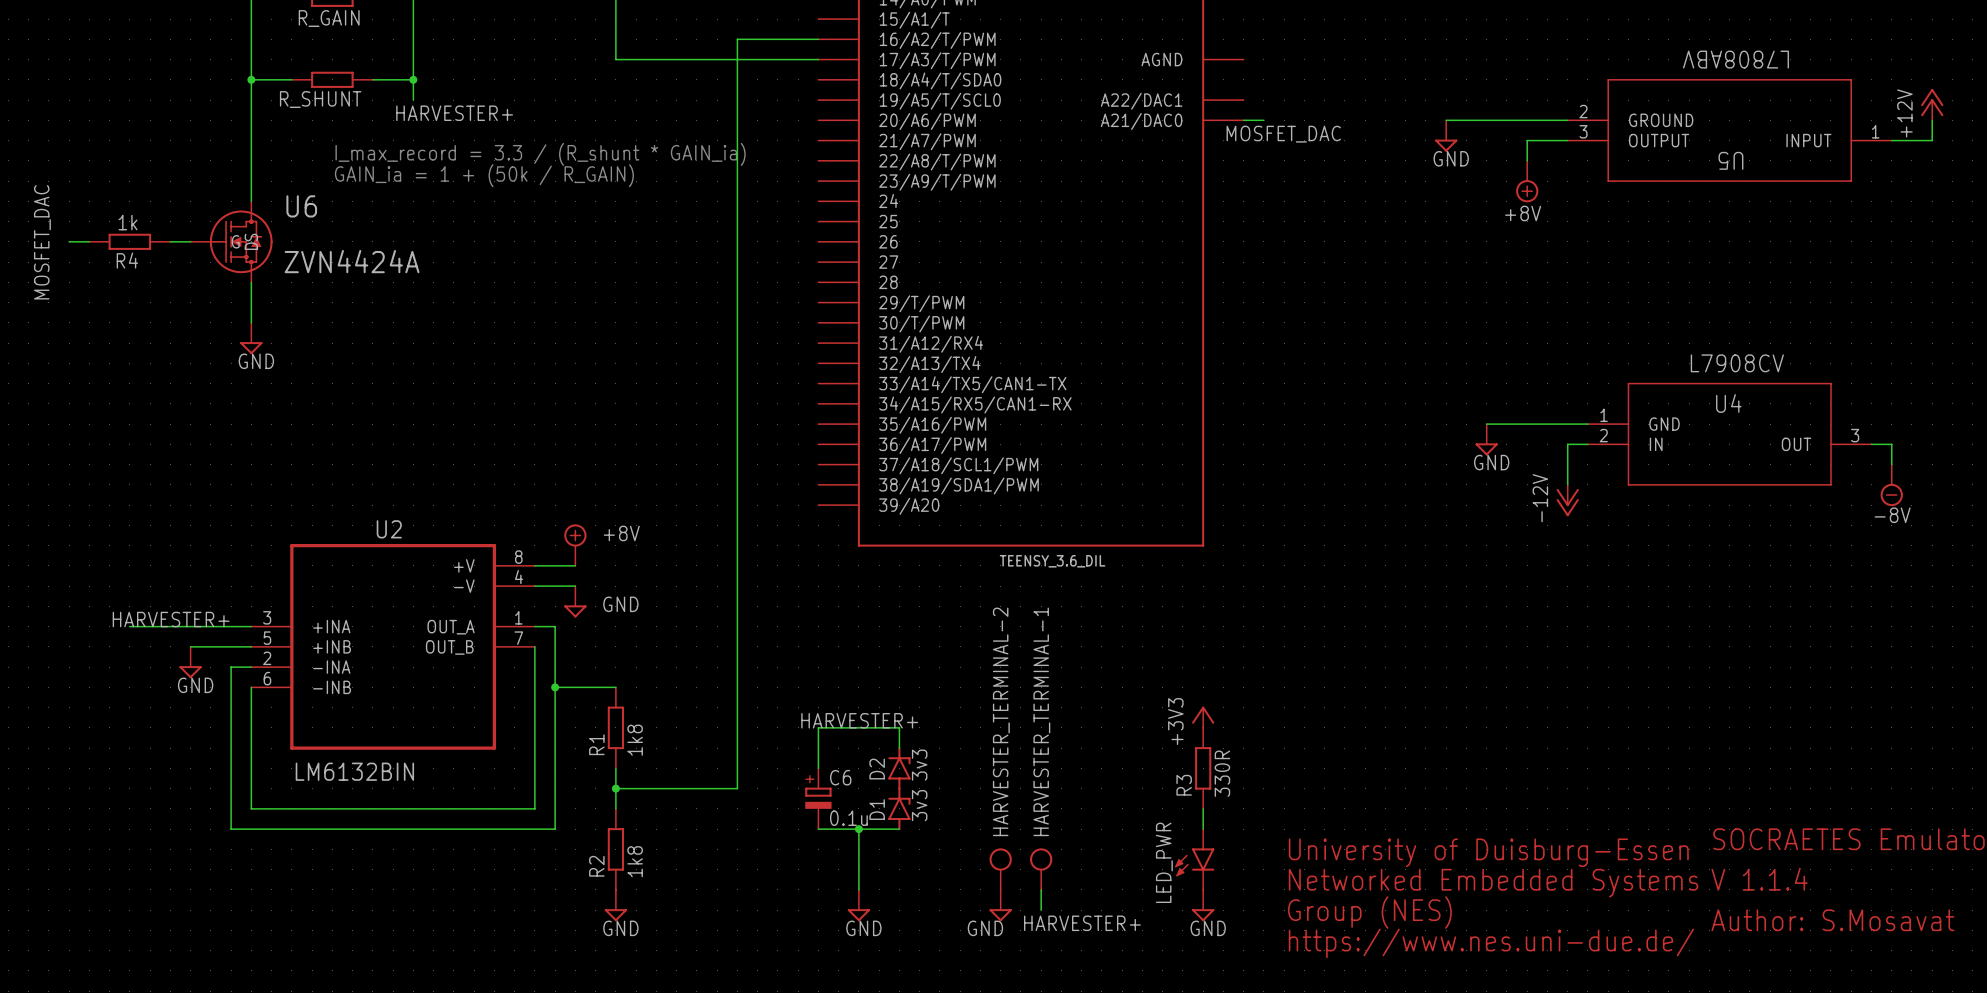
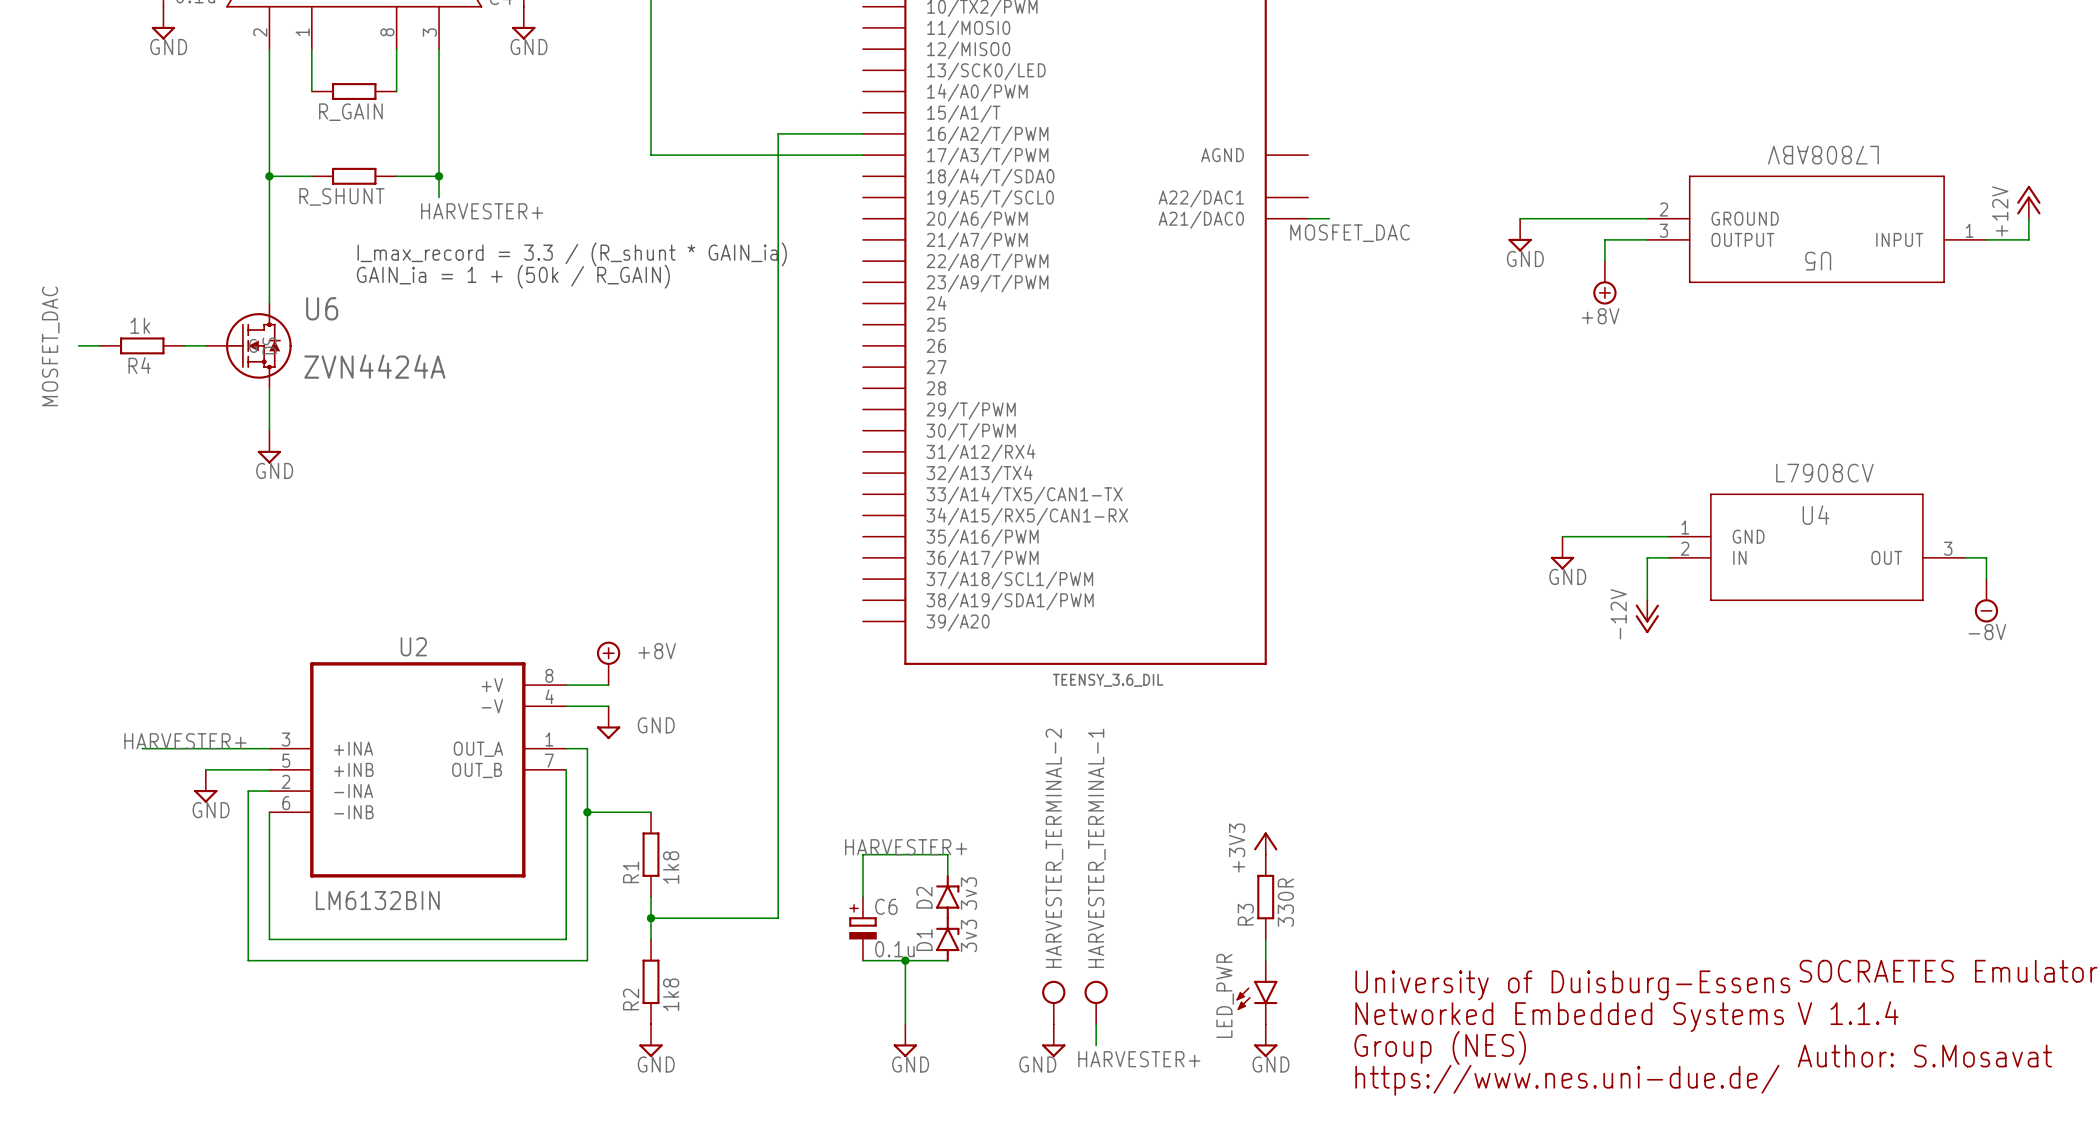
text: University of Duisburg-Essen (1488, 852) -> University of Duisburg-Essens (1572, 985)

